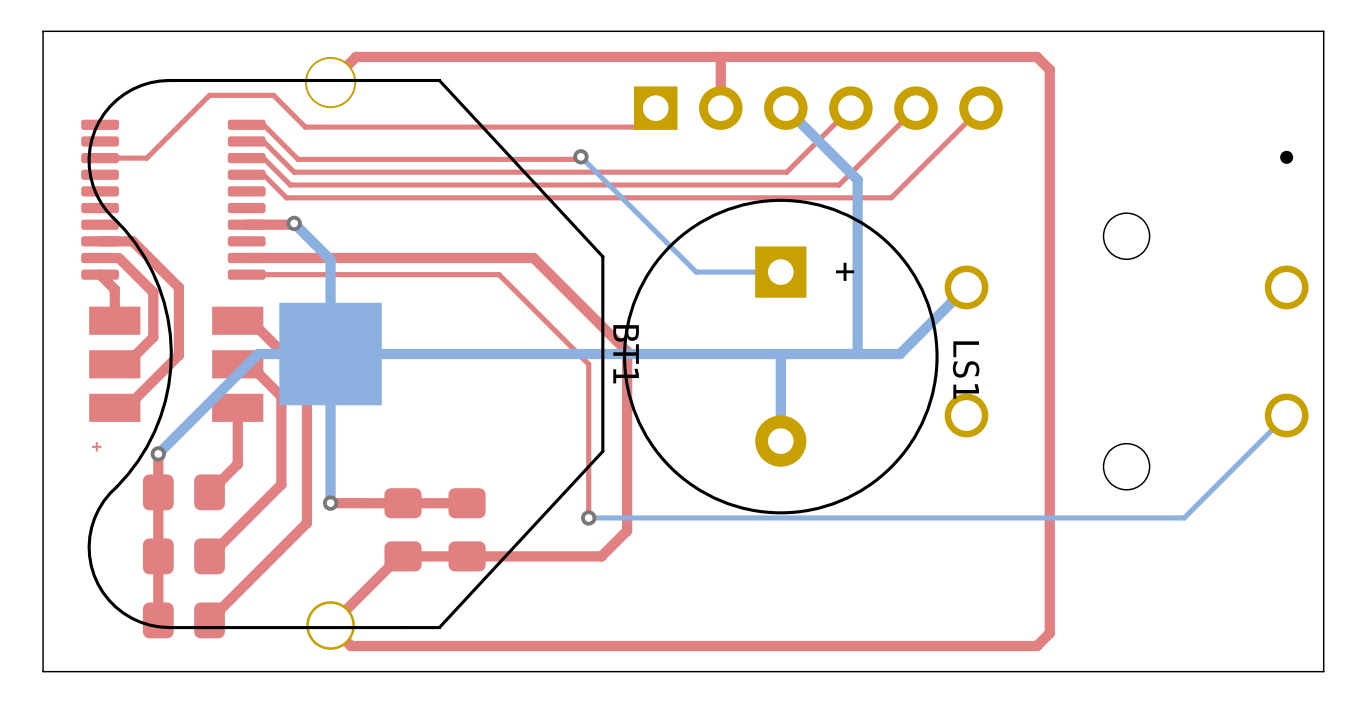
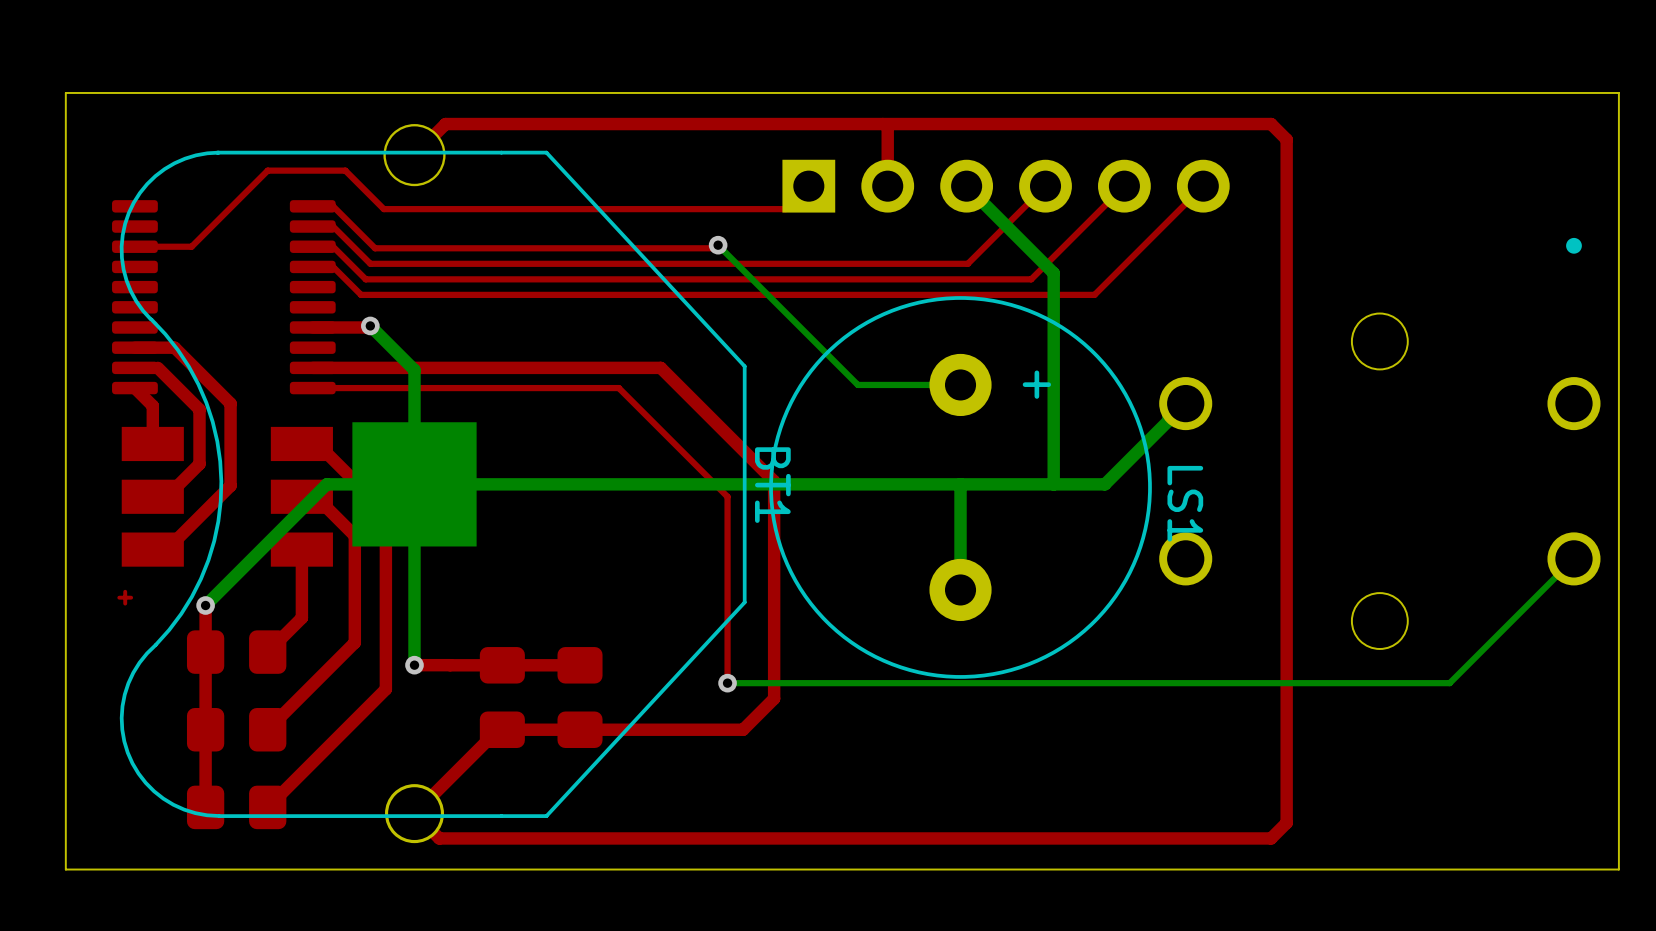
LS1 footprint: [623, 198, 939, 515] -> [769, 296, 1152, 679]

